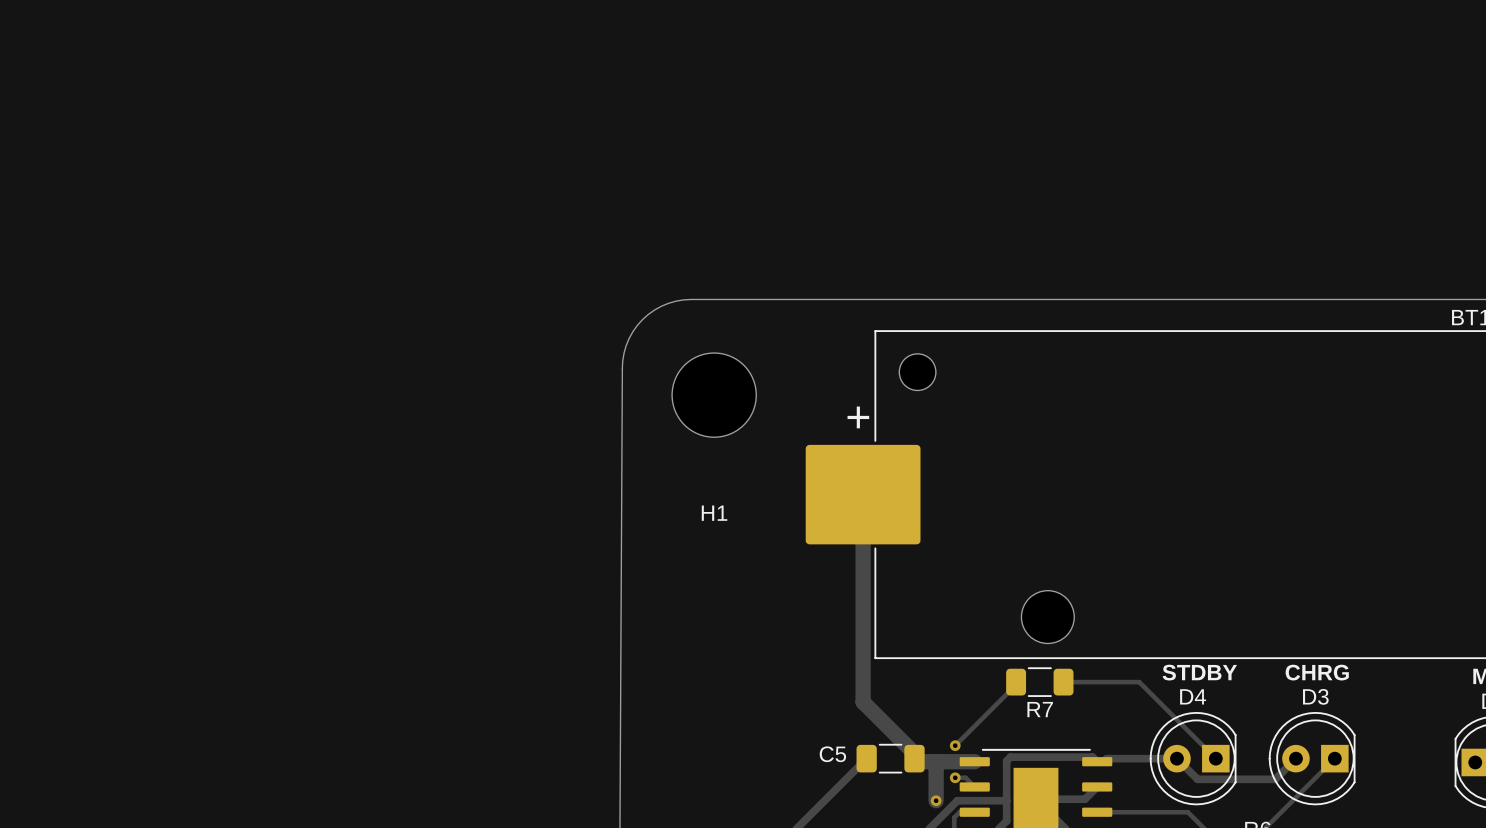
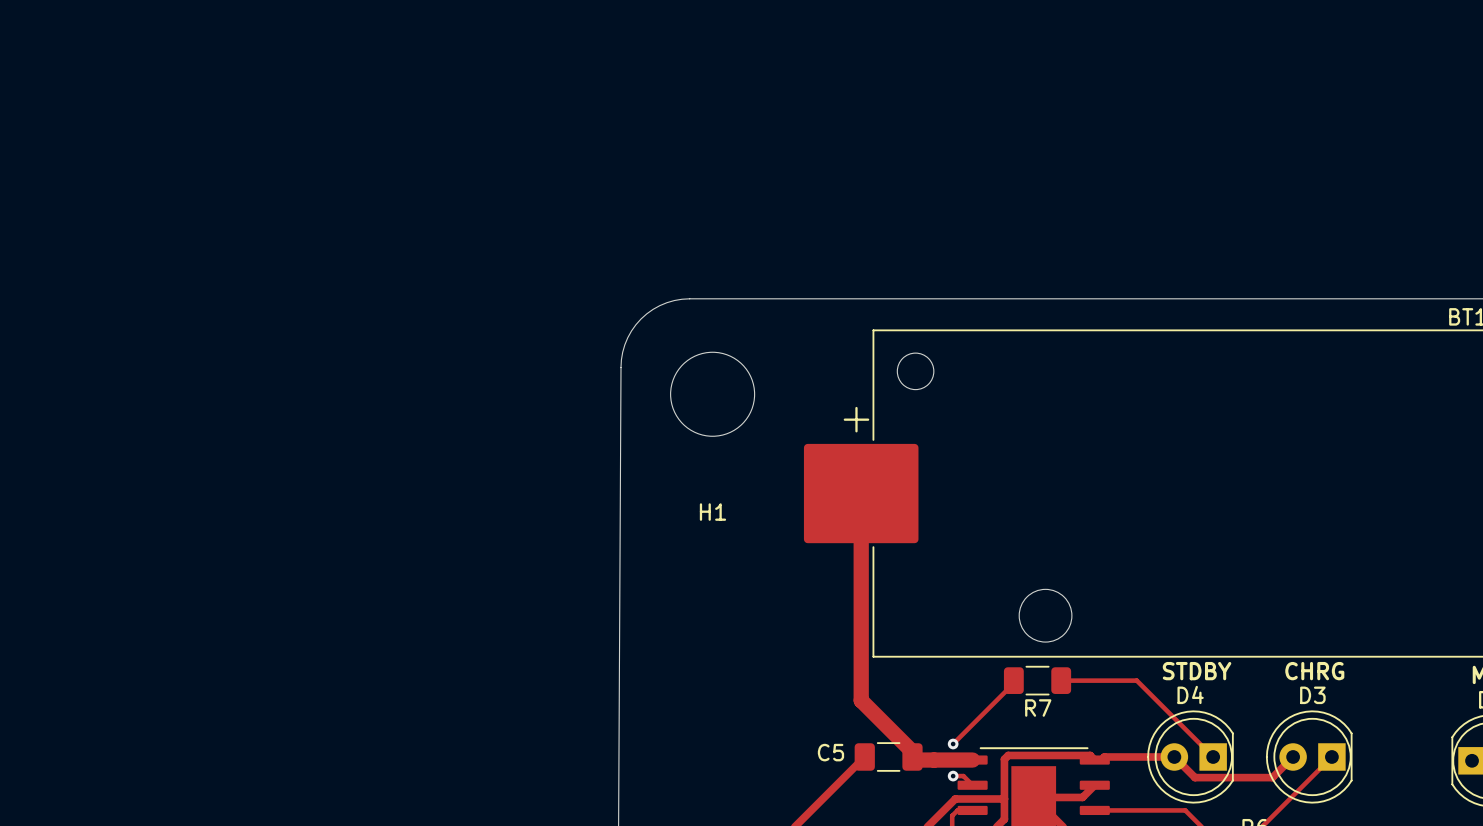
track: (936, 761) (936, 800) -> none
via: (936, 800) -> none

